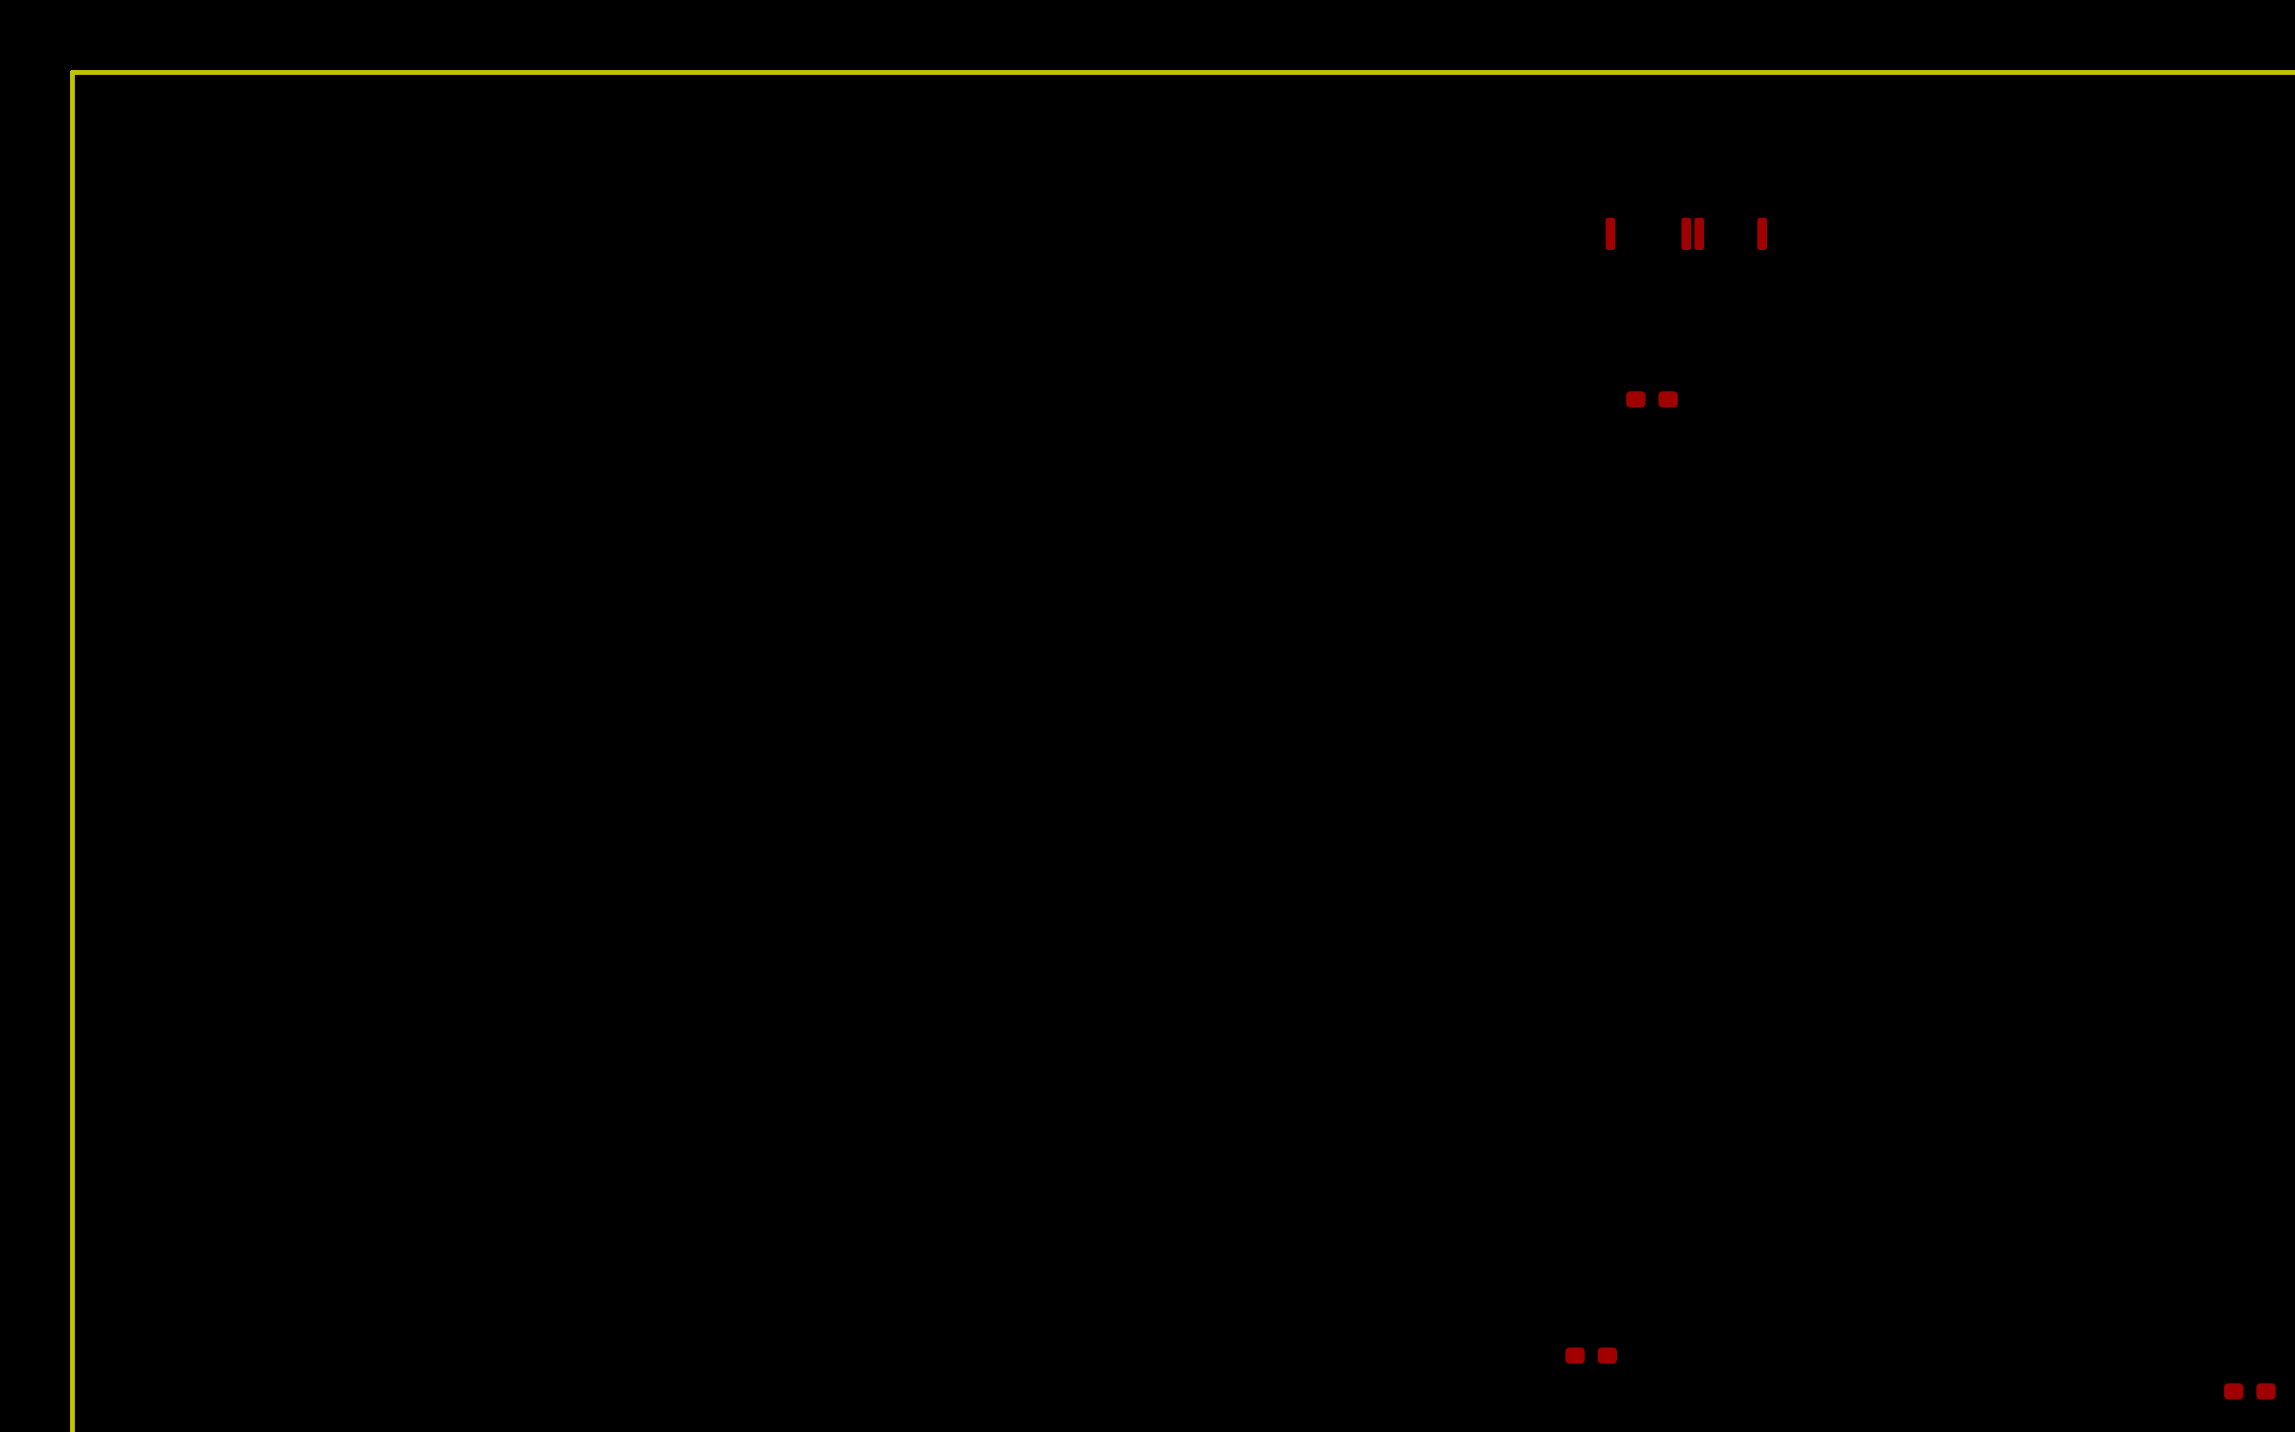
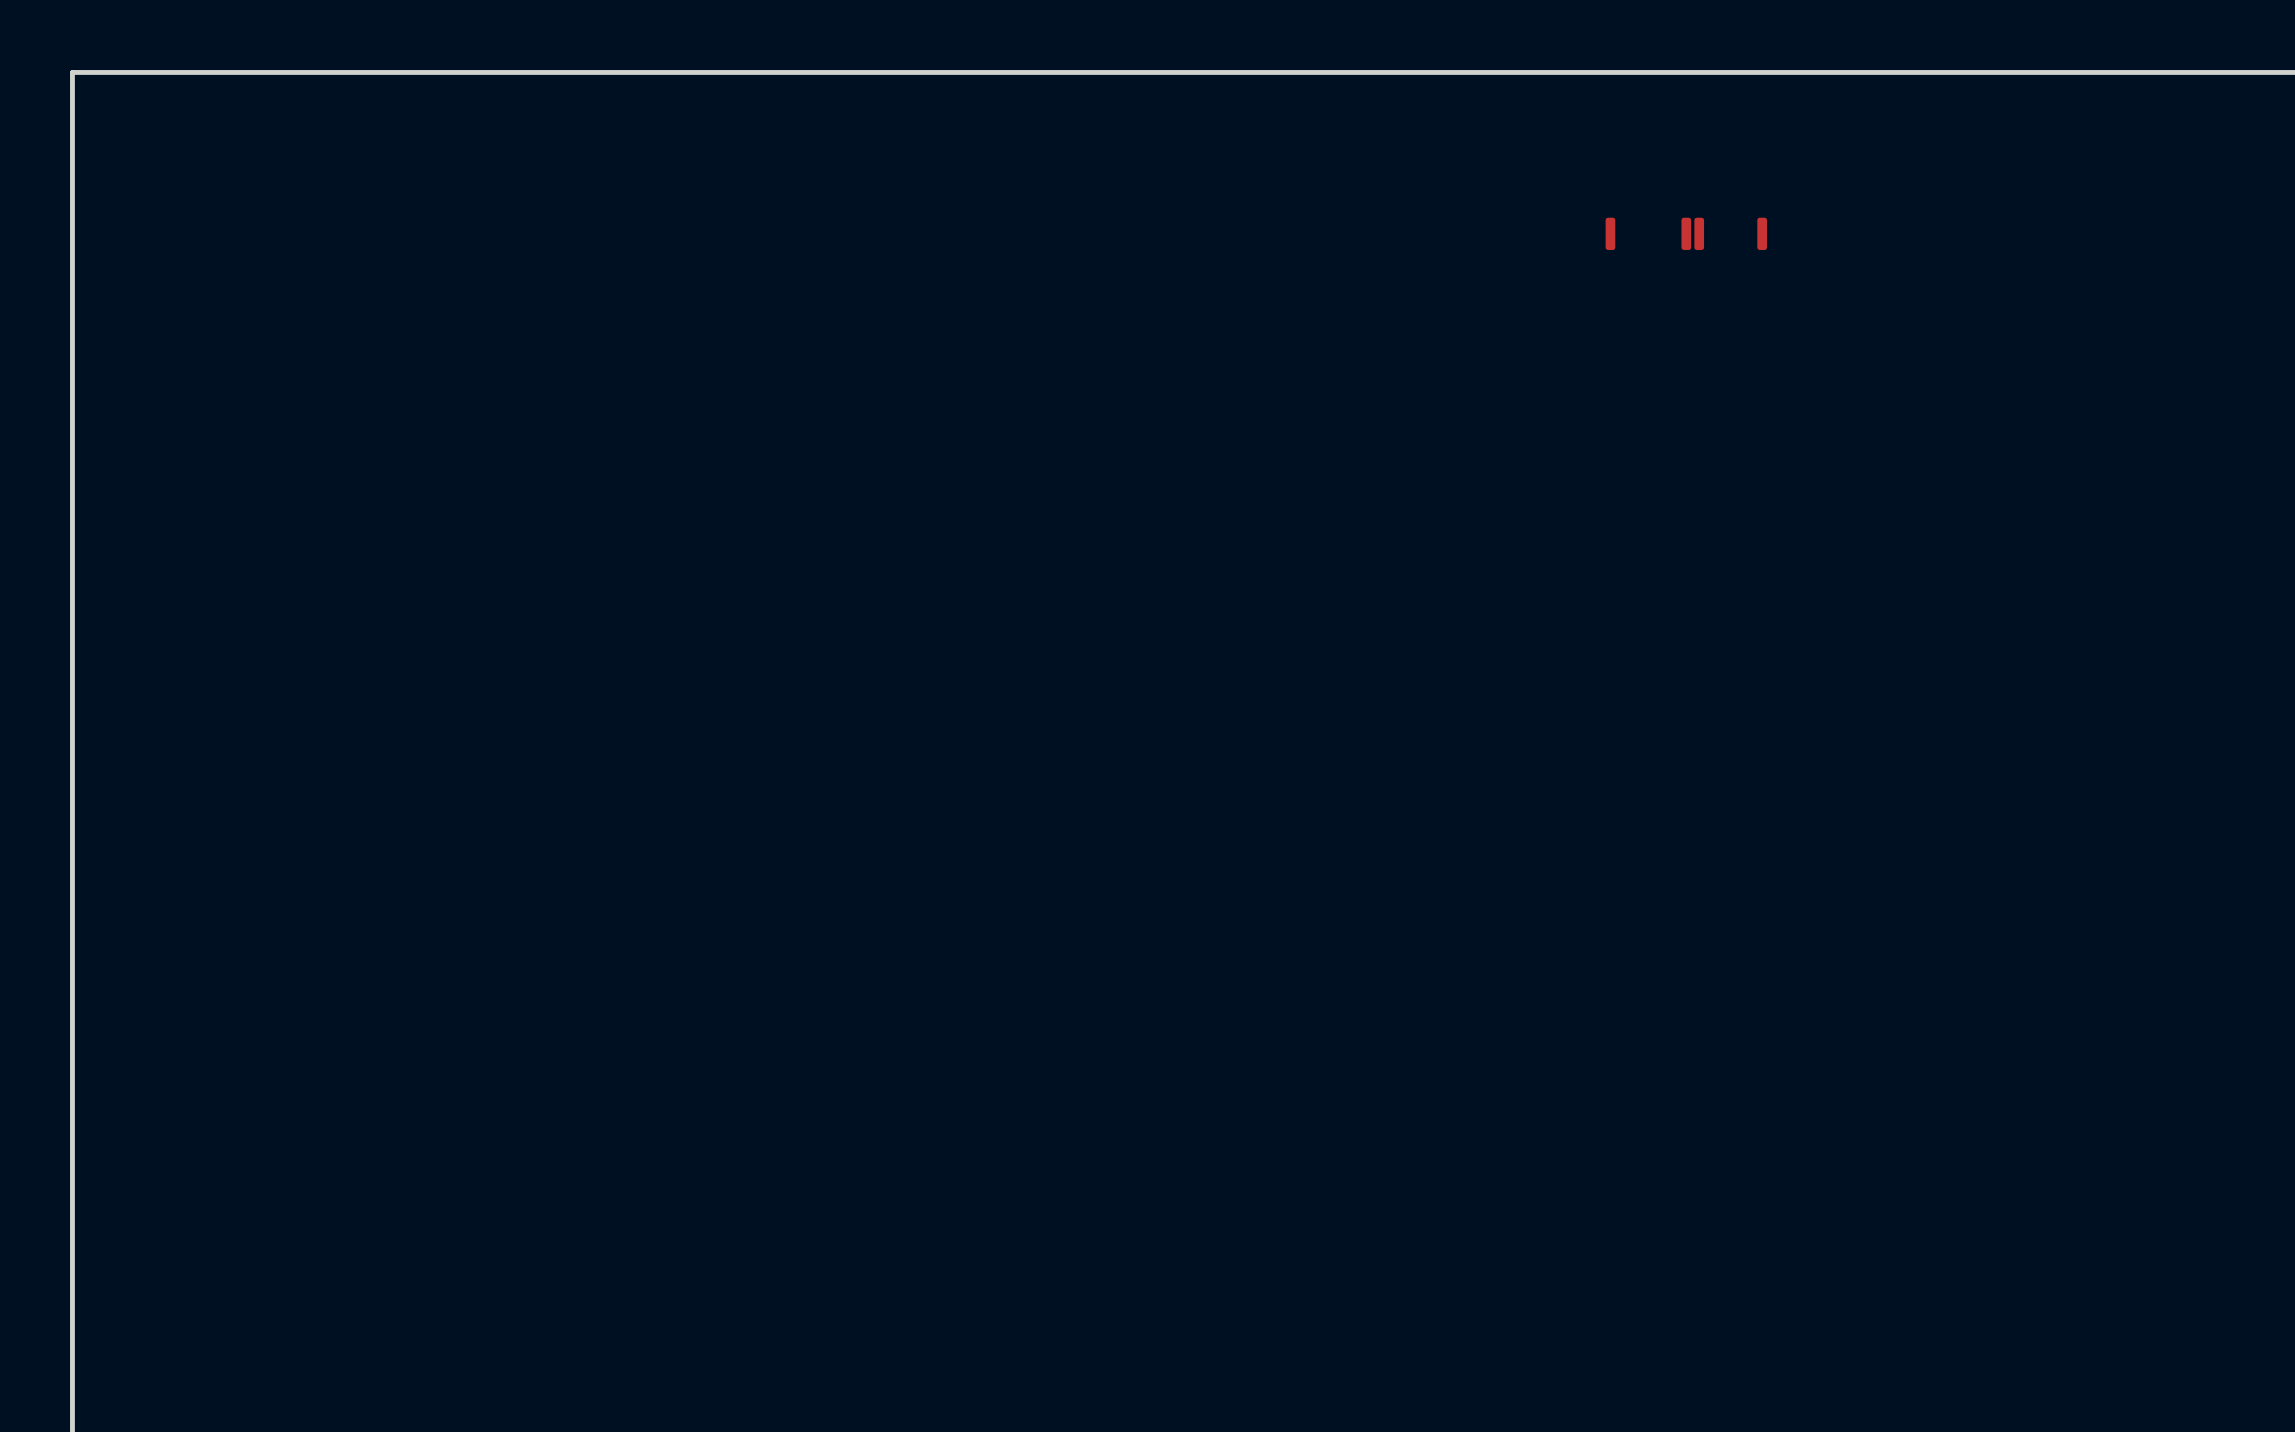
part: (1651, 399) -> none
part: (1591, 1355) -> none
part: (2249, 1391) -> none

